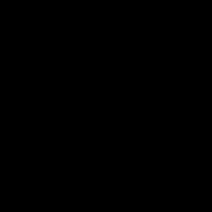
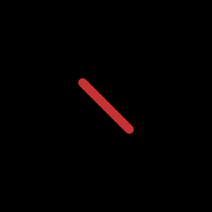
track: none -> (82, 82) (129, 129)

